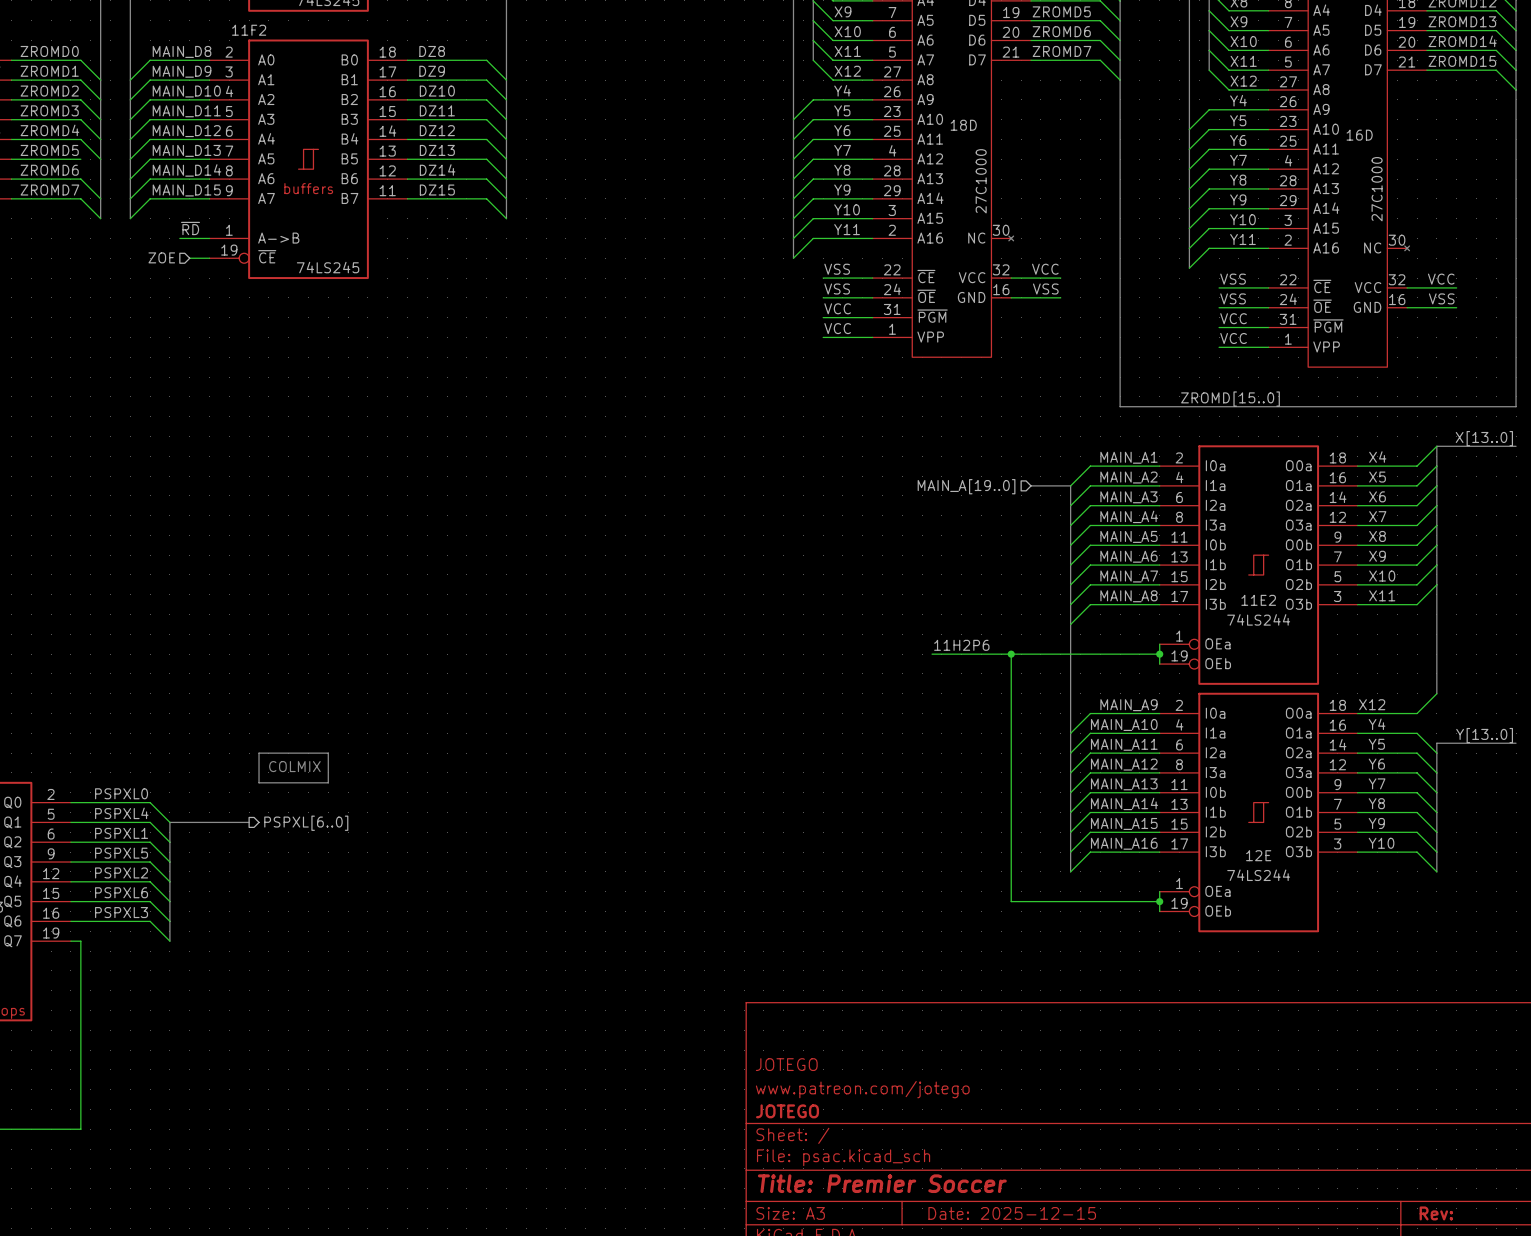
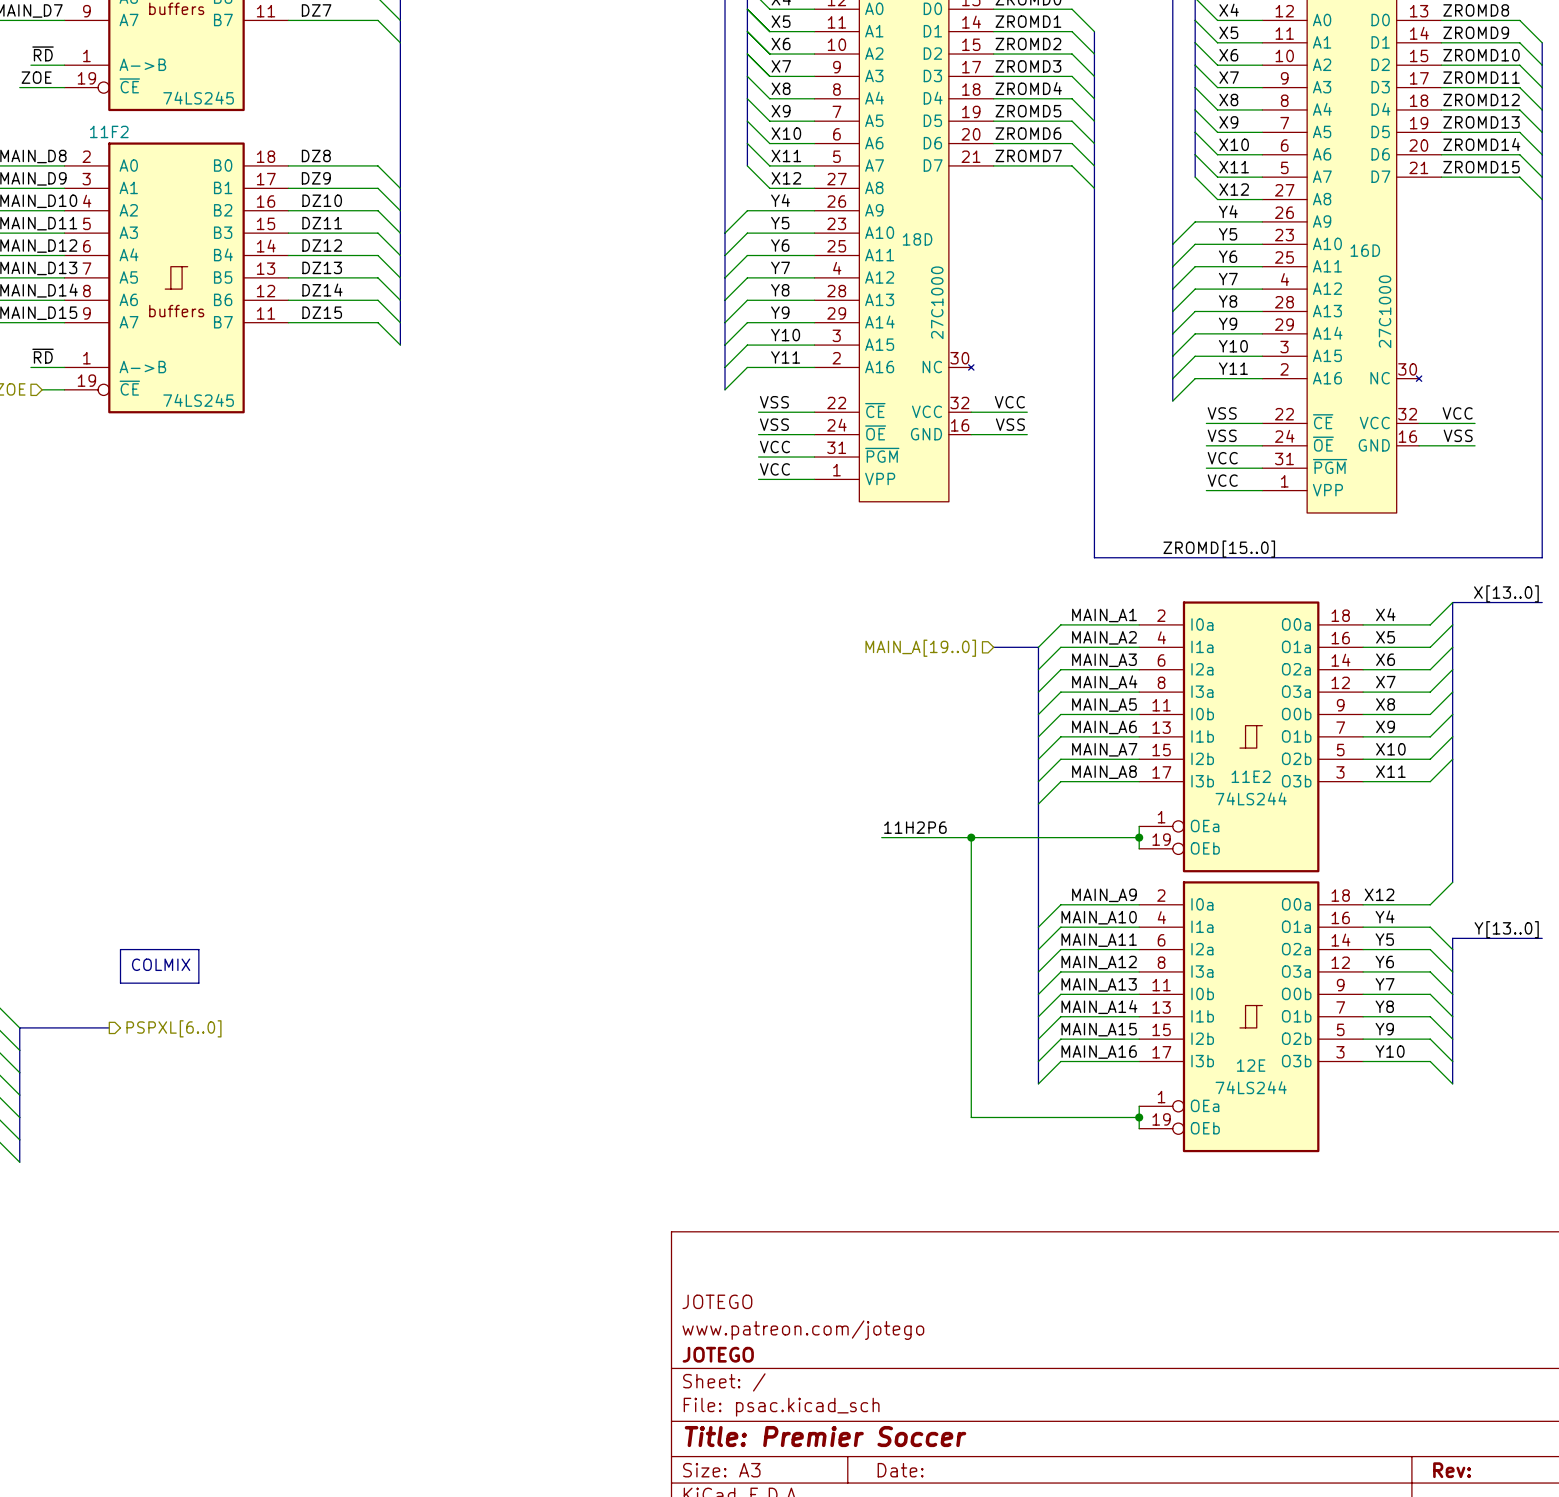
title block: Date: 2025-12-15 (1012, 1213) -> Date: (900, 1470)

